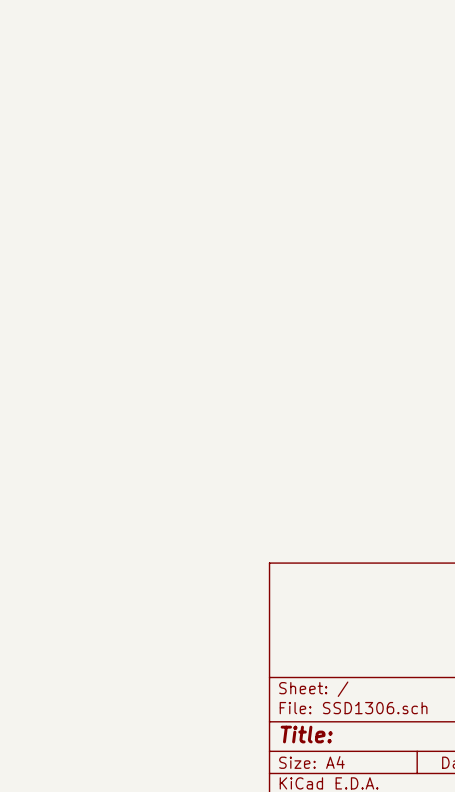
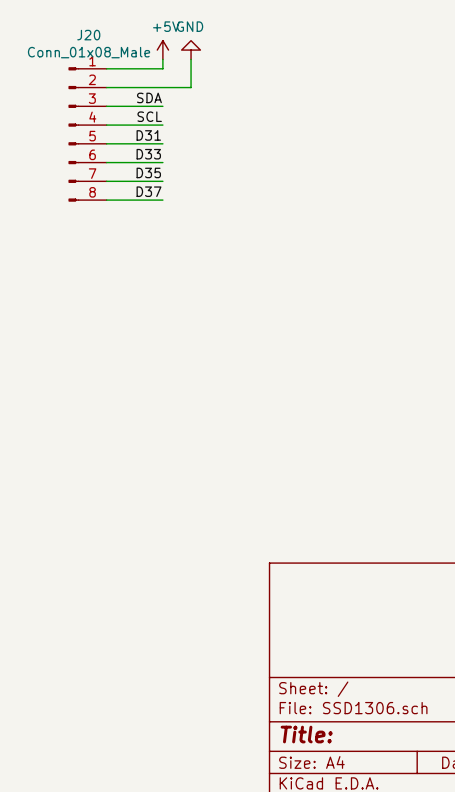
power symbol: none -> +5V (162, 50)
power symbol: none -> GND (191, 50)
wire: none -> (162, 59) (162, 68) (106, 68)
wire: none -> (191, 59) (191, 87) (106, 87)
label: none -> SDA (149, 97)
wire: none -> (106, 106) (162, 106)
label: none -> SCL (149, 116)
wire: none -> (106, 125) (162, 125)
J20: none -> Conn_01x08_Male (87, 134)
label: none -> D31 (148, 135)
wire: none -> (106, 143) (162, 143)
label: none -> D33 (148, 154)
wire: none -> (106, 162) (162, 162)
label: none -> D35 (148, 172)
wire: none -> (106, 181) (162, 181)
label: none -> D37 (148, 191)
wire: none -> (106, 200) (162, 200)

